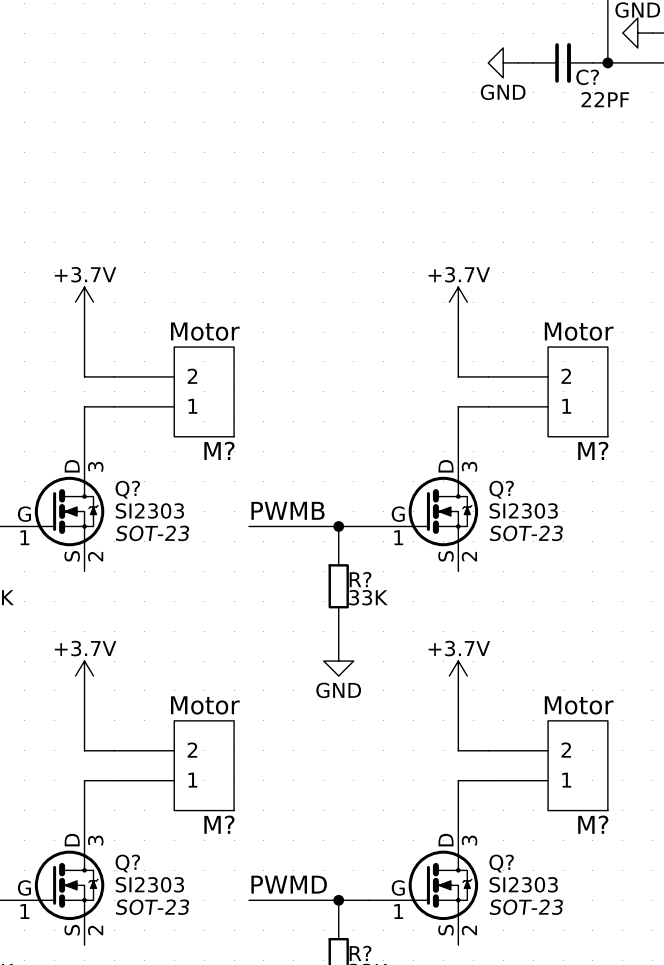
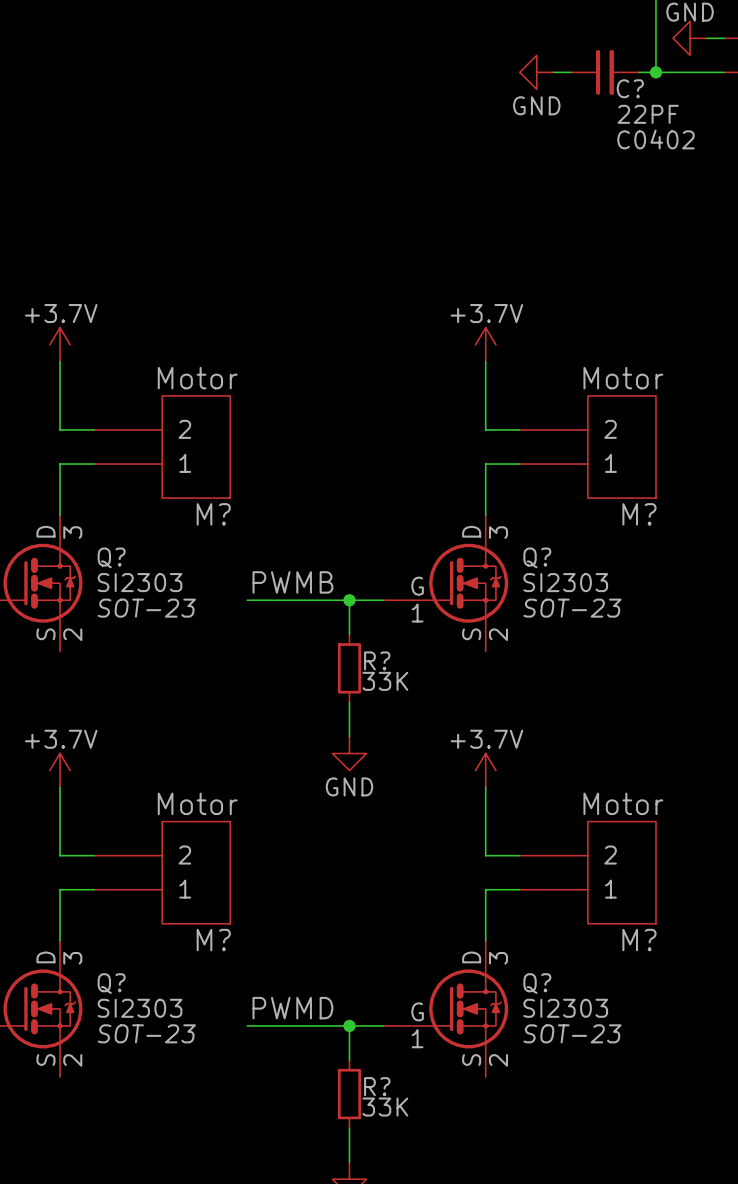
C? text: none -> C0402 (655, 139)

